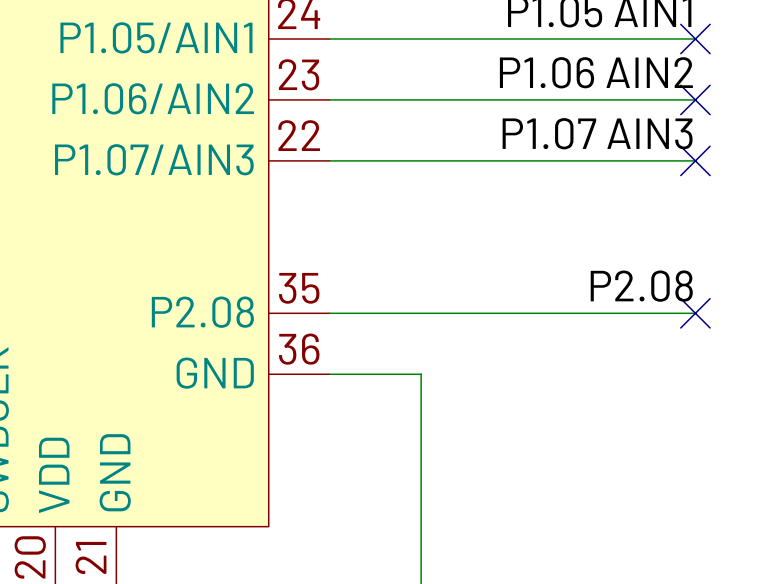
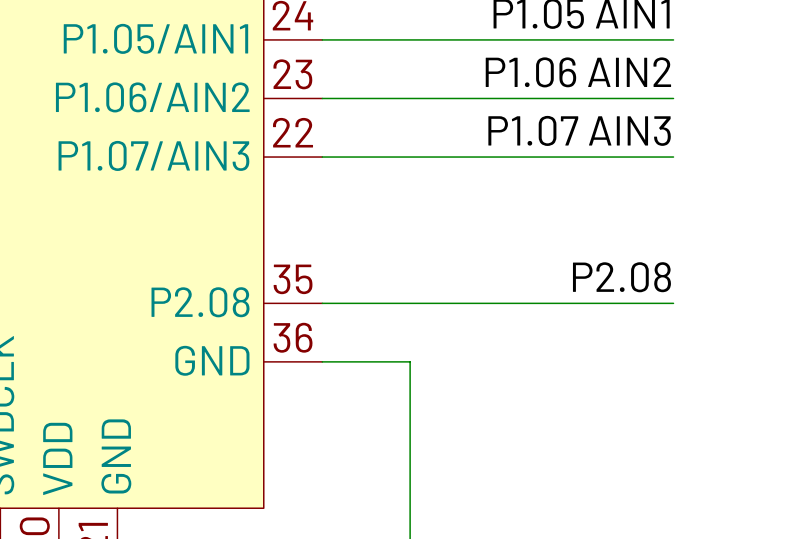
no-connect mark: (695, 38) -> none
no-connect mark: (695, 99) -> none
no-connect mark: (695, 160) -> none
no-connect mark: (695, 313) -> none

